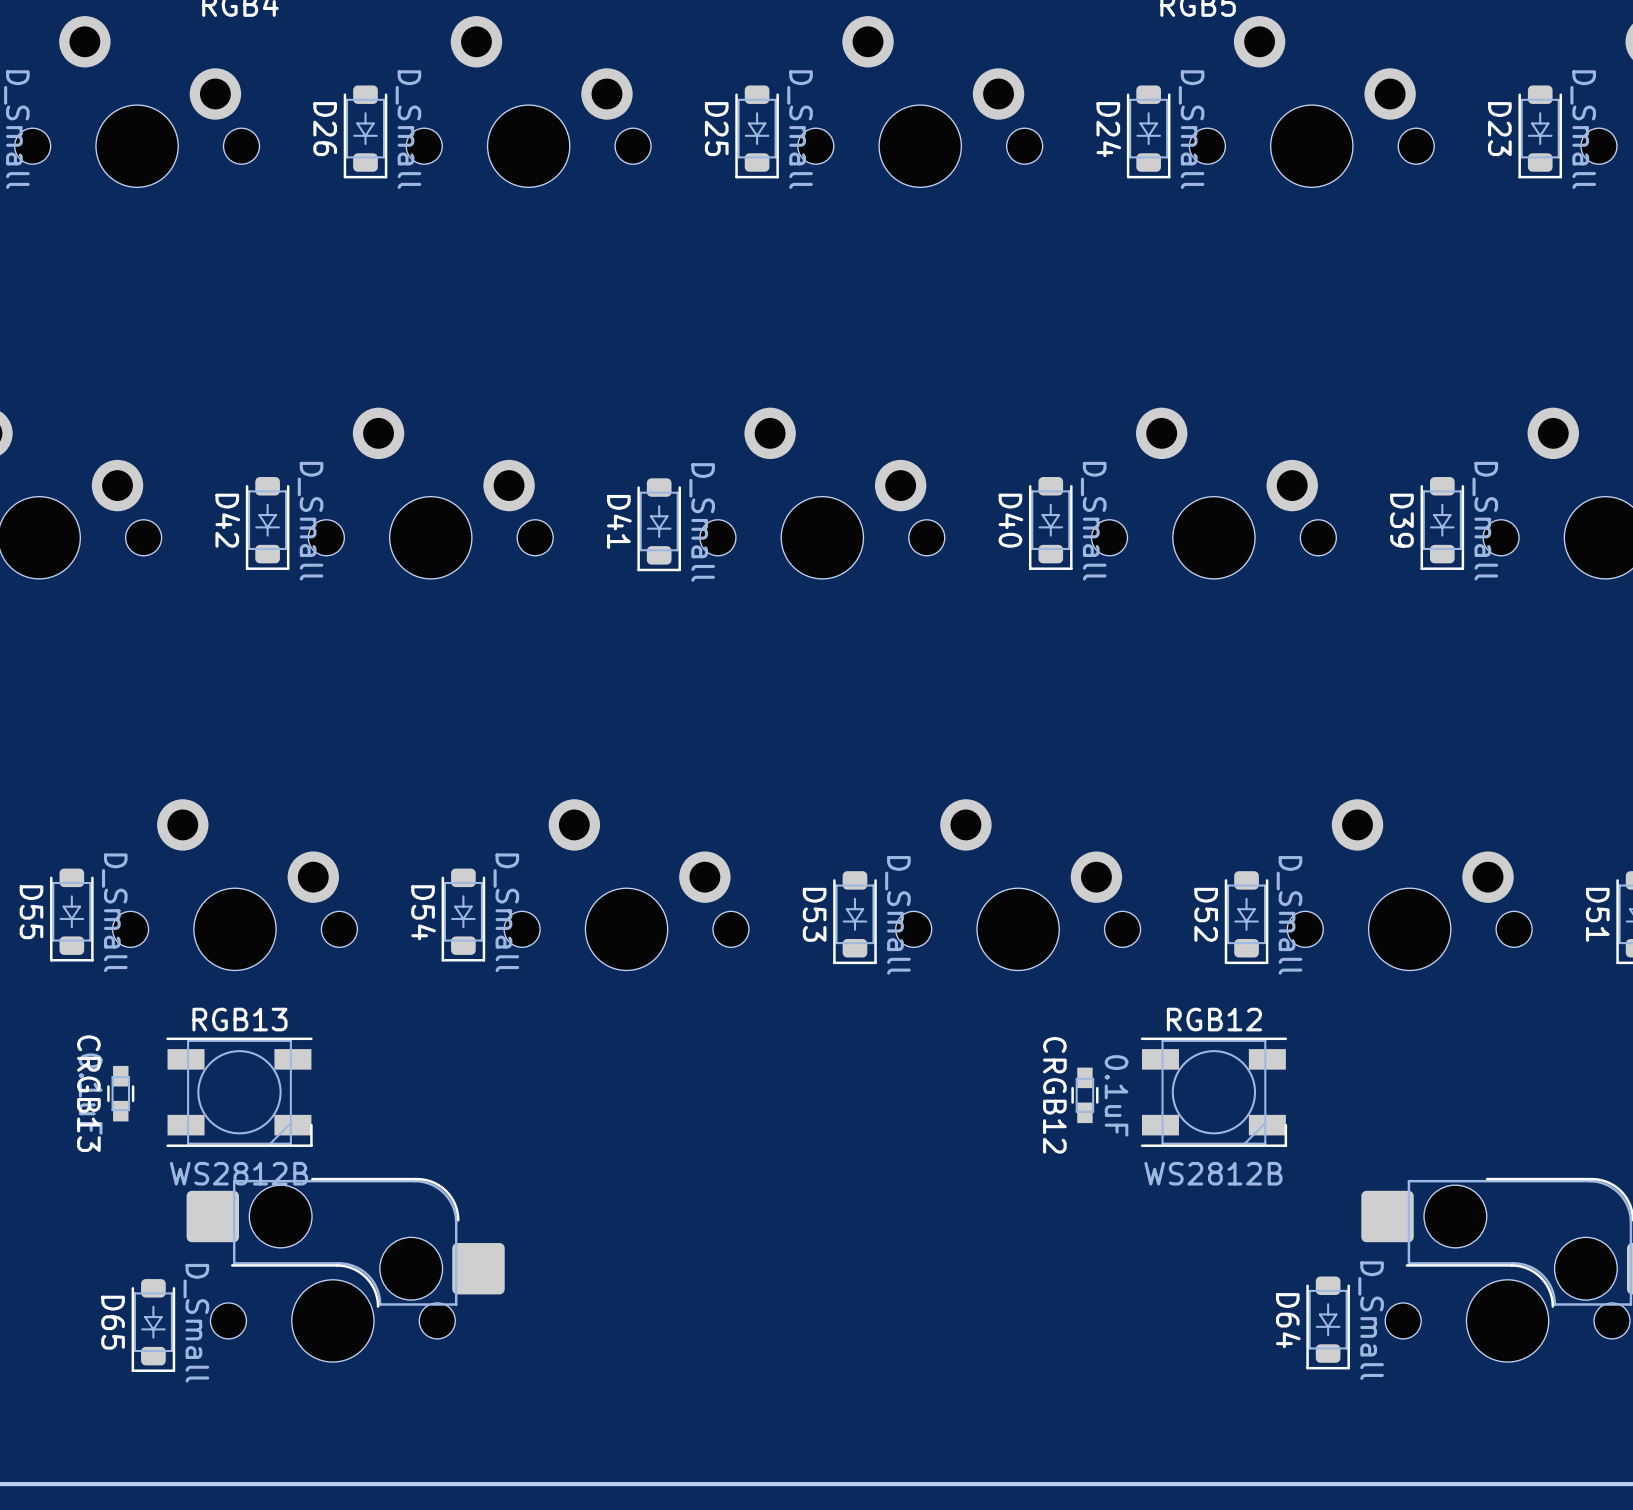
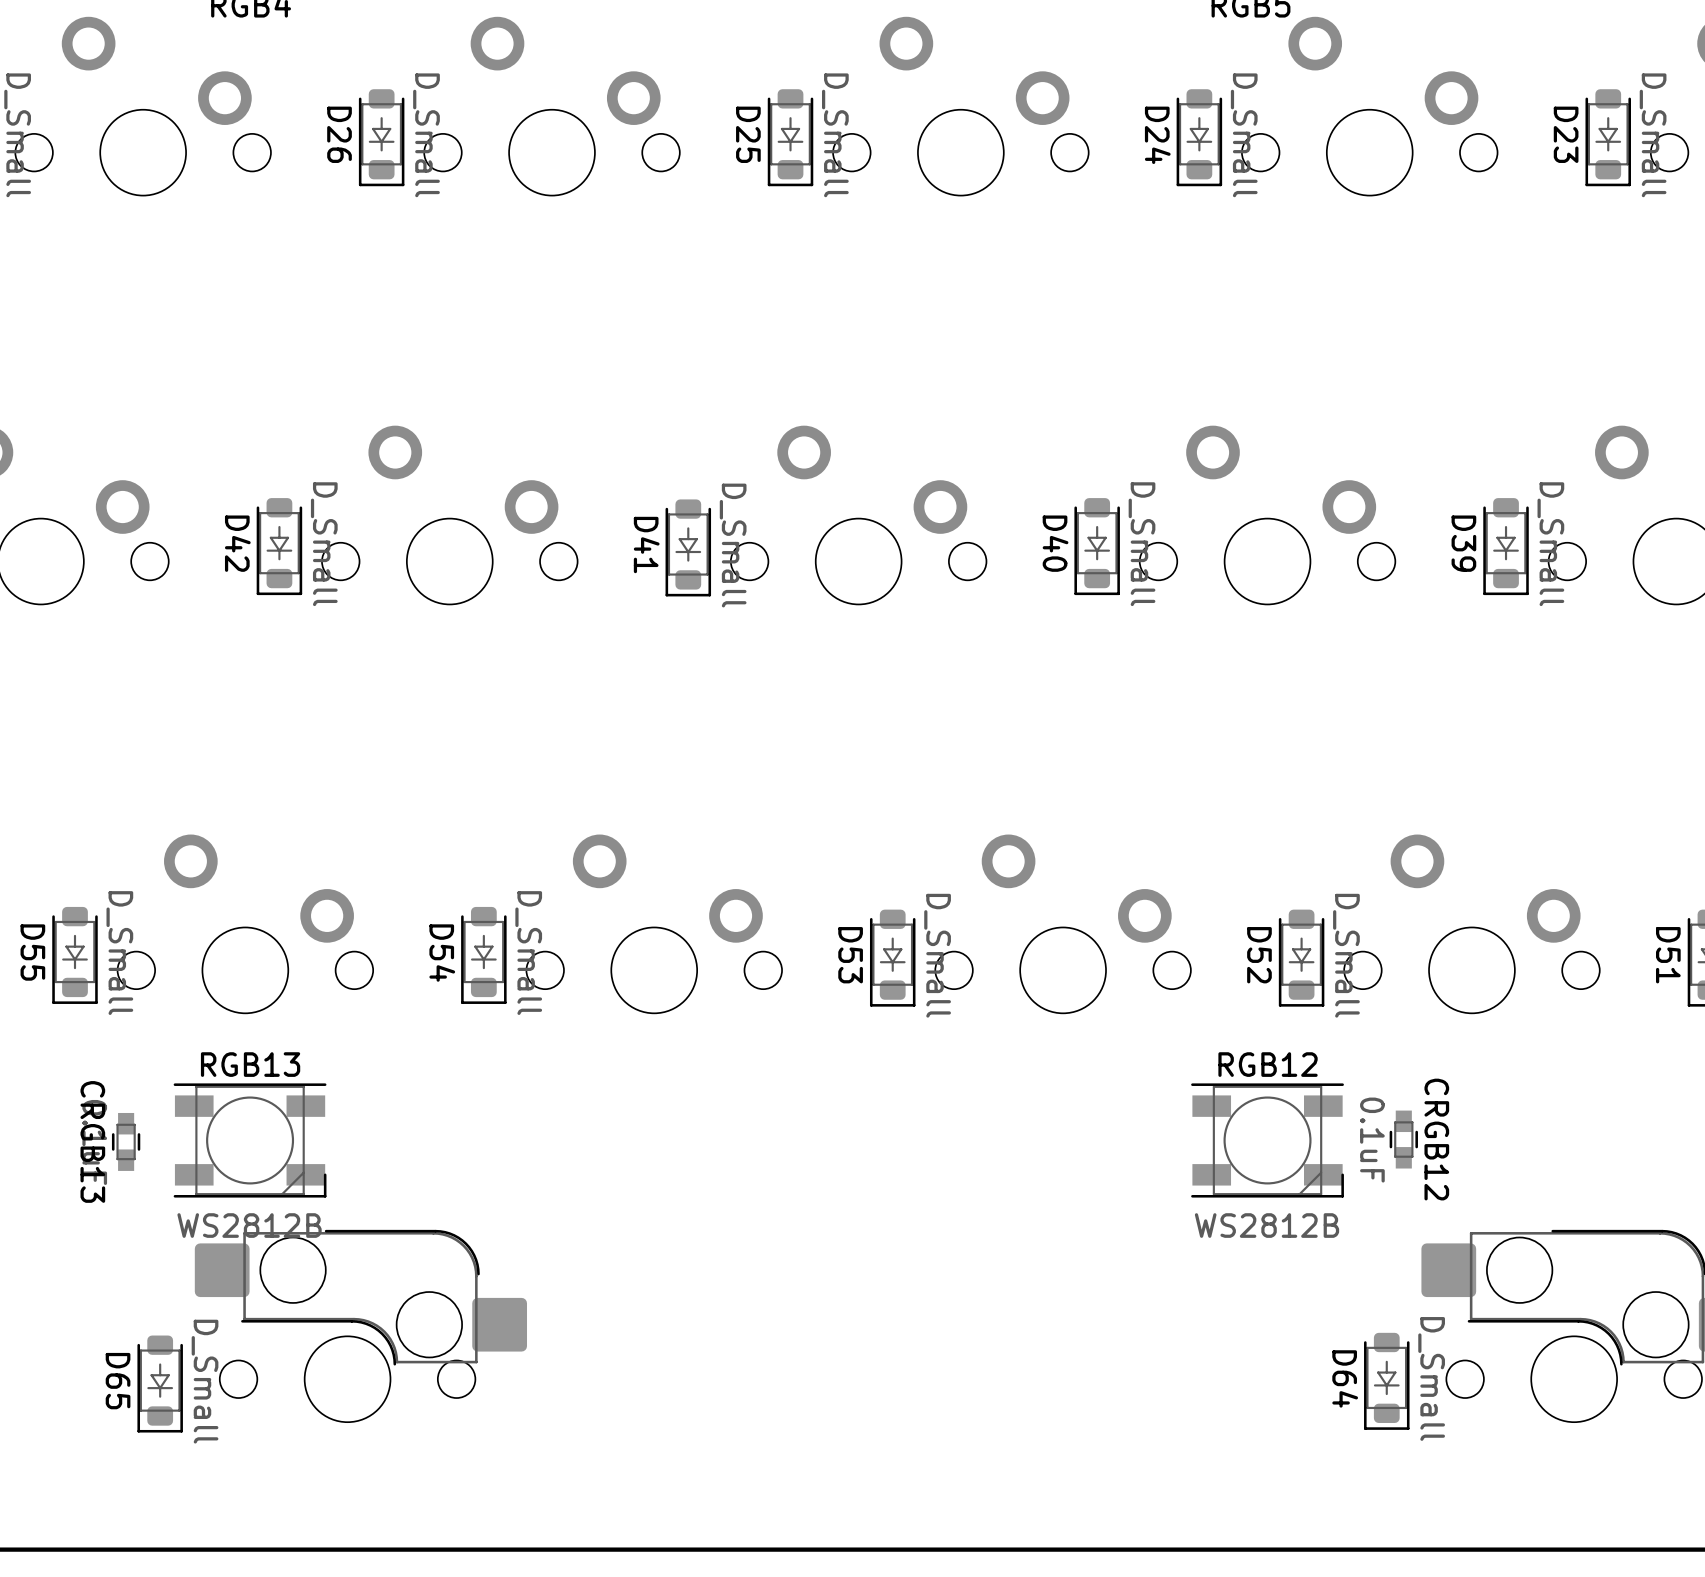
CRGB12 name position: CRGB12 (1054, 1095) -> CRGB12 (1436, 1139)
CRGB12 position: (1084, 1095) -> (1403, 1139)
CRGB12 value position: 0.1uF (1116, 1095) -> 0.1uF (1372, 1140)

